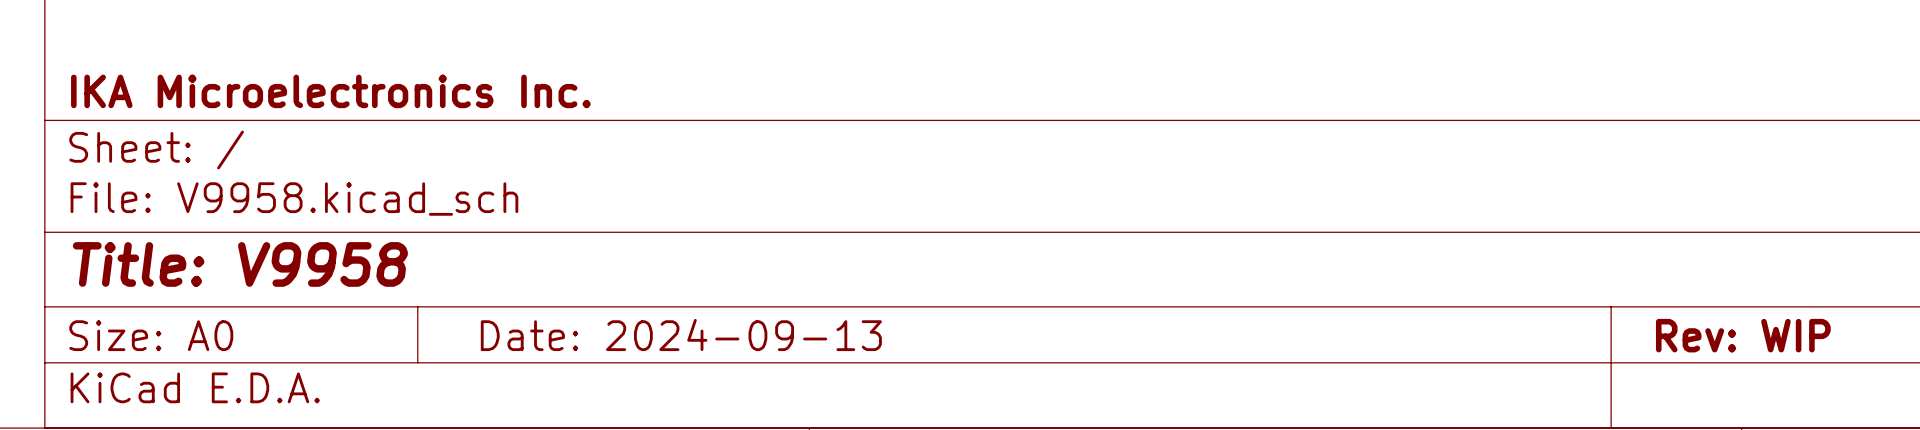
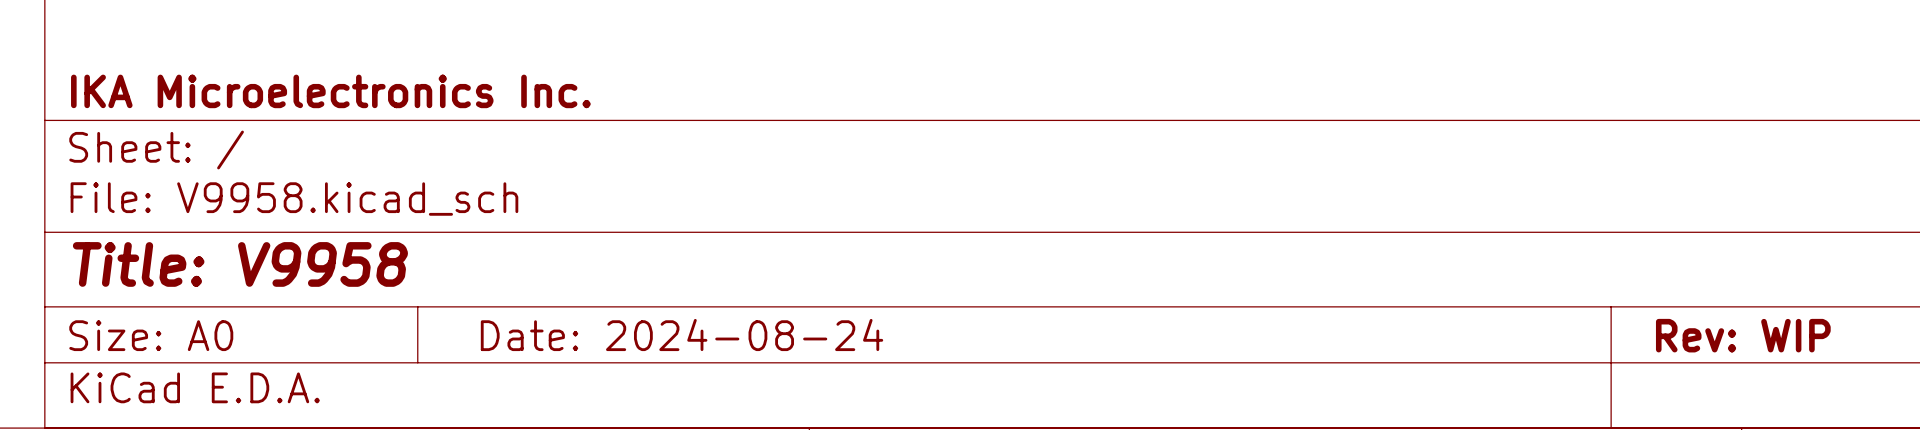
title block: Date: 2024-09-13 (681, 334) -> Date: 2024-08-24 (682, 334)

